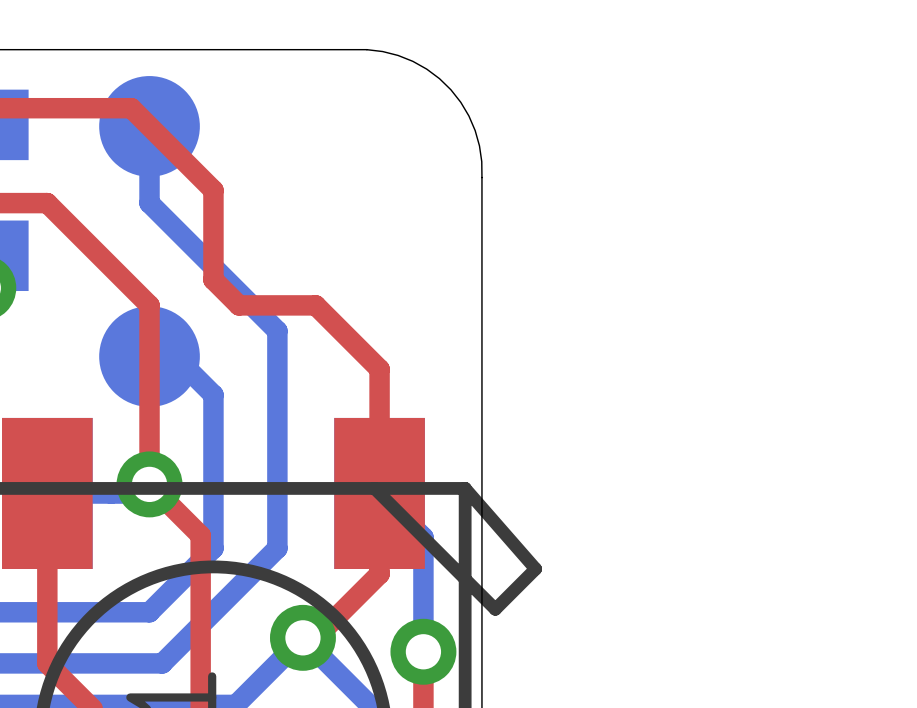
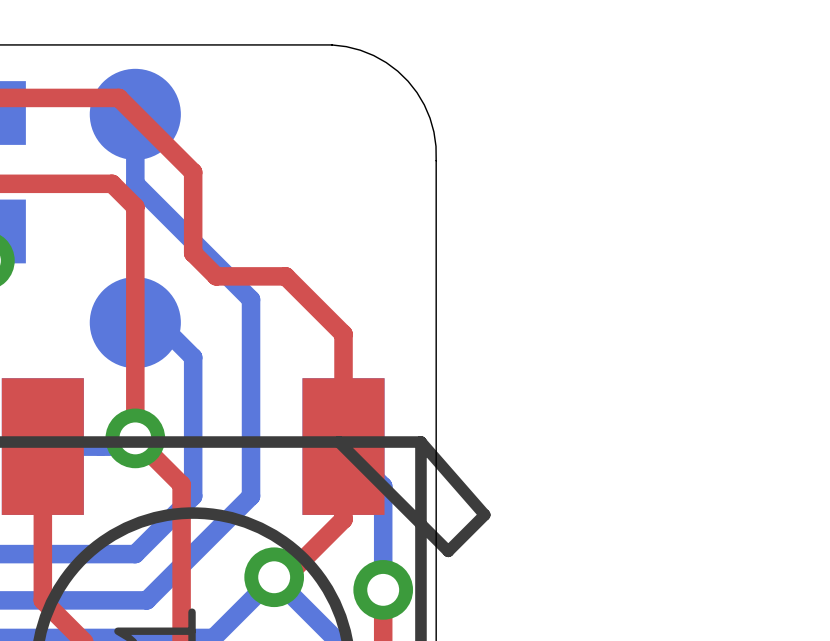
top track: (47, 203) (149, 305) -> (42, 183) (112, 183) (135, 206) (135, 276)

